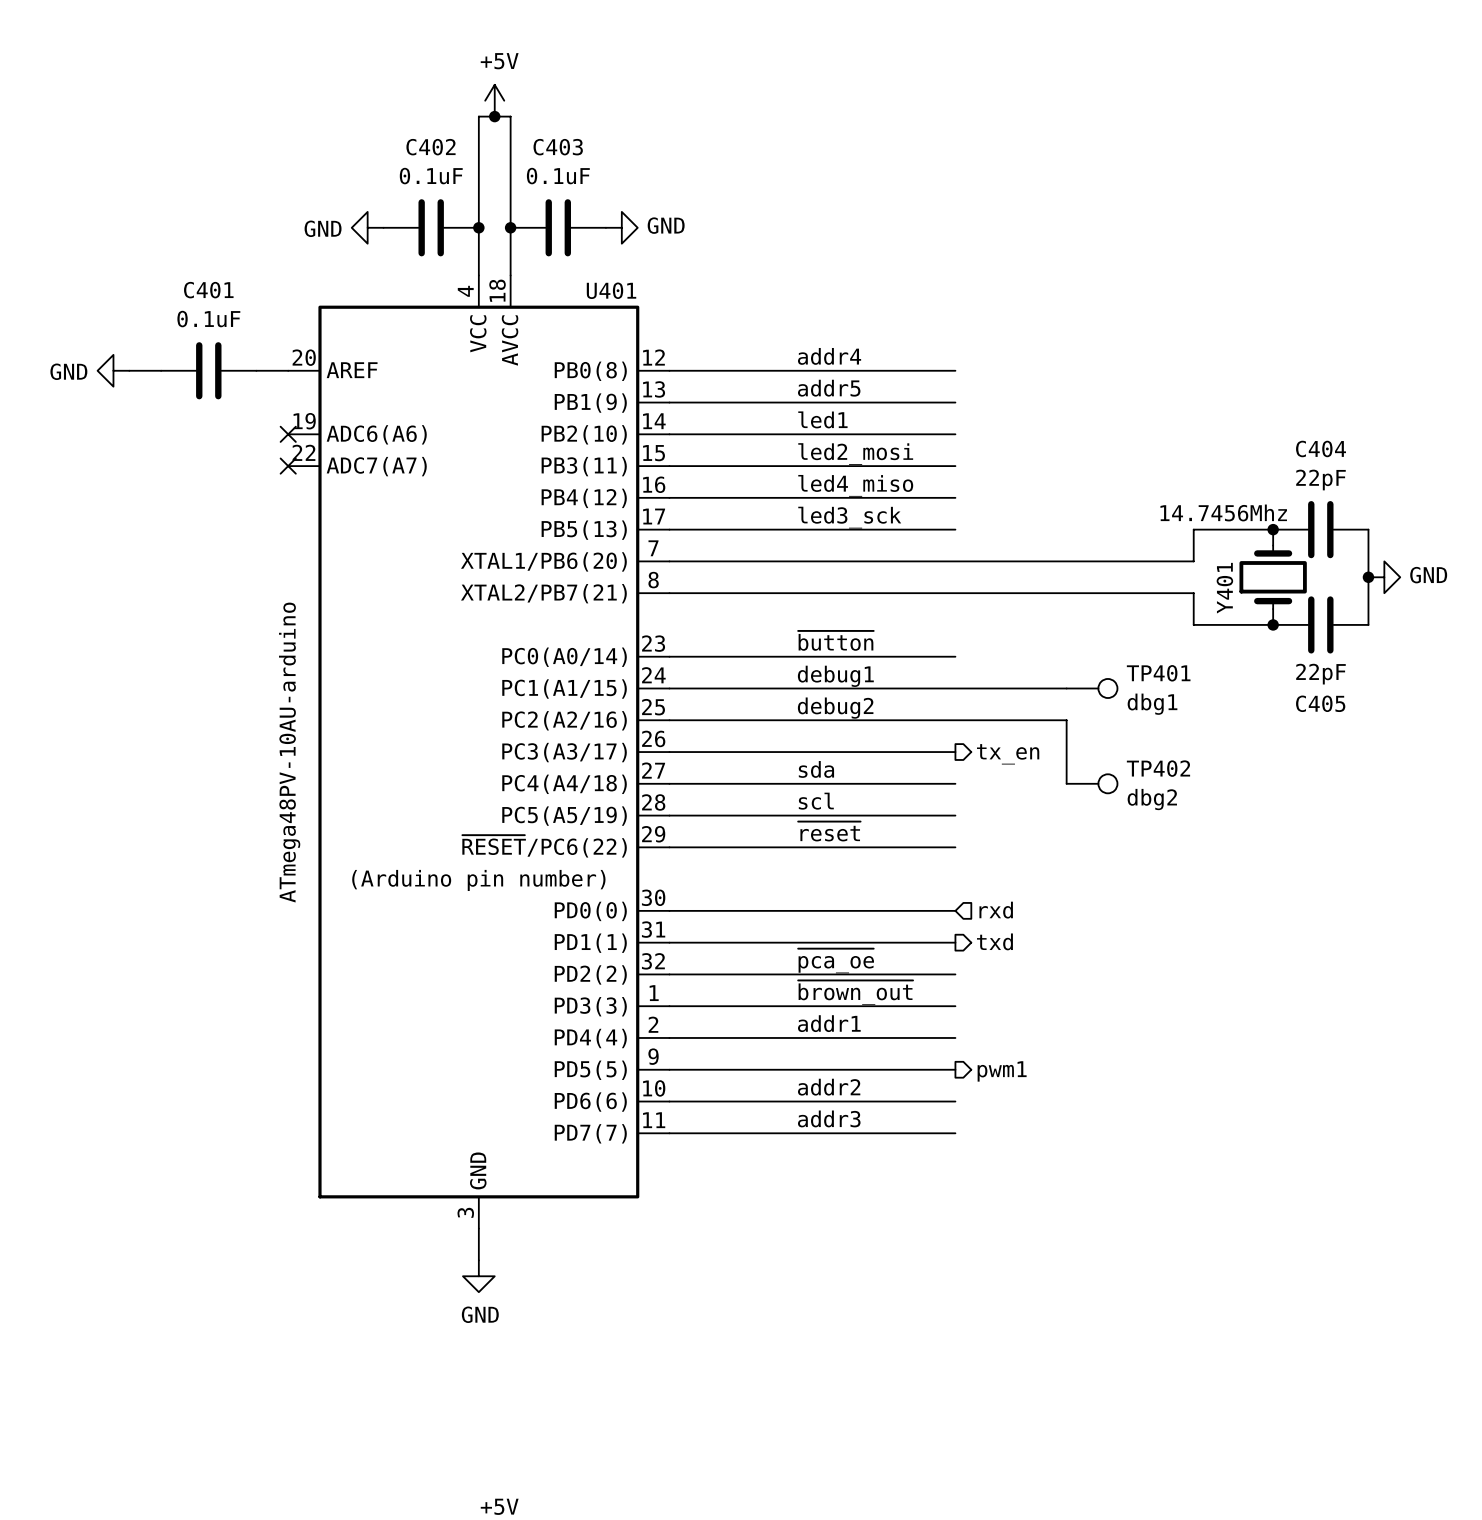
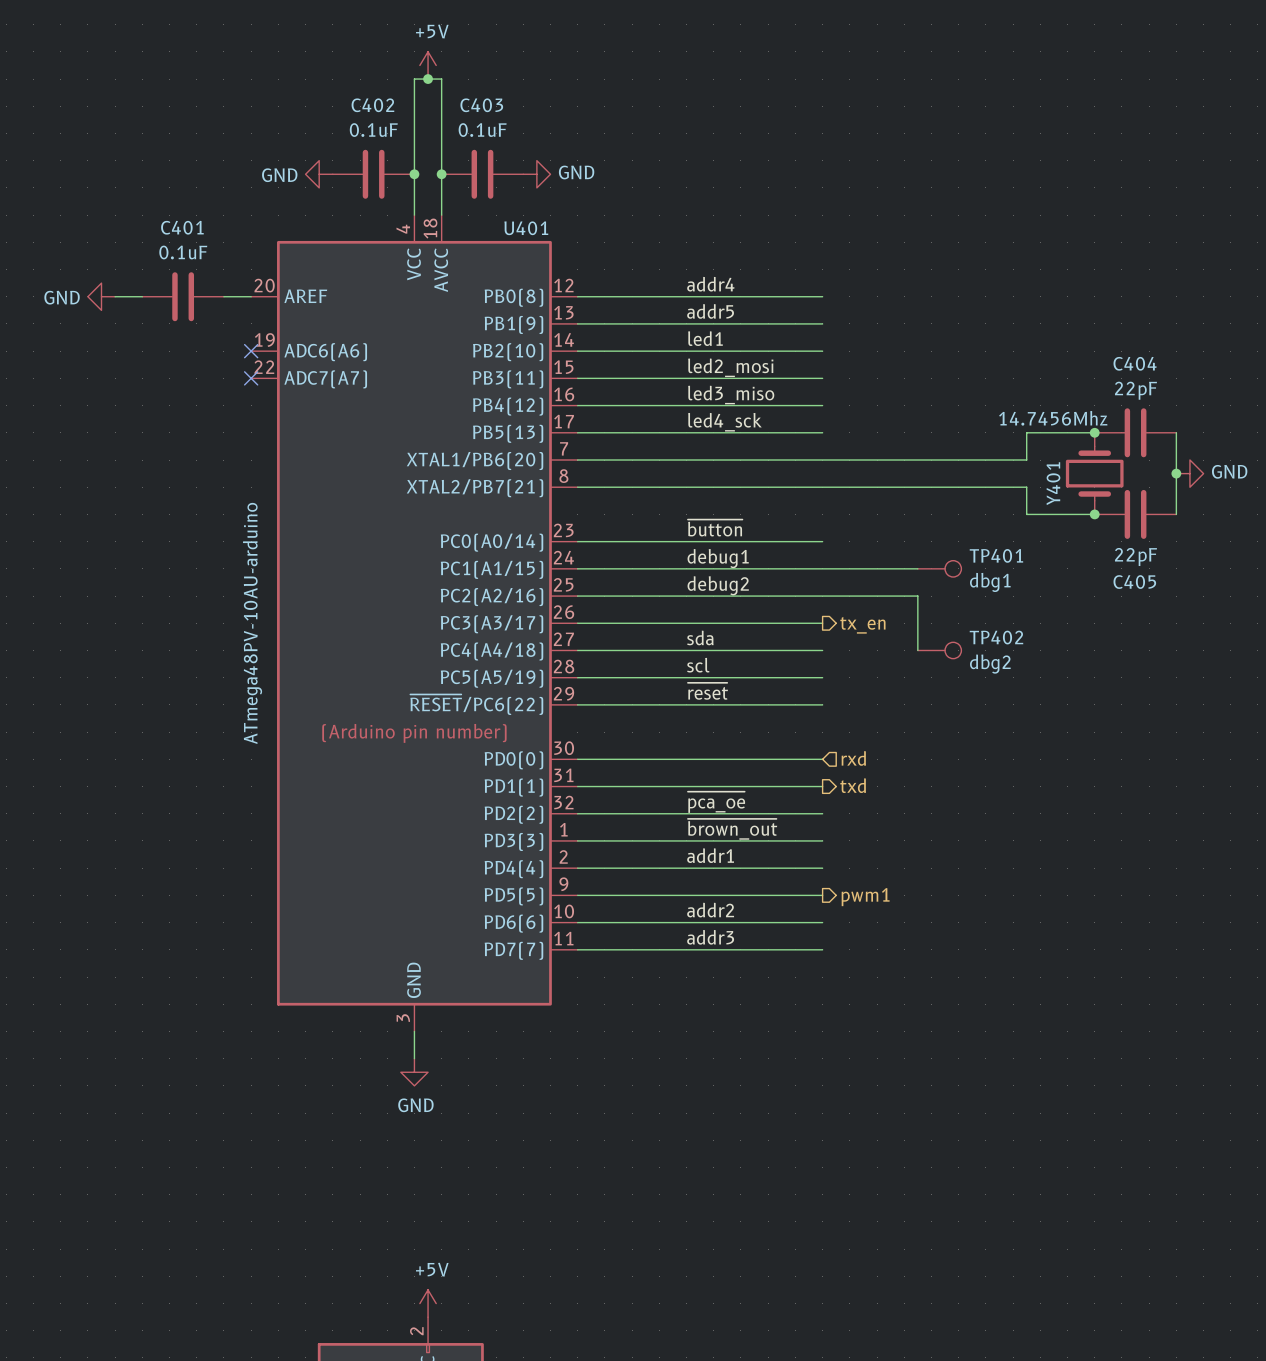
label: led4_miso (855, 485) -> led3_miso (731, 395)
label: led3_sck (849, 517) -> led4_sck (724, 422)

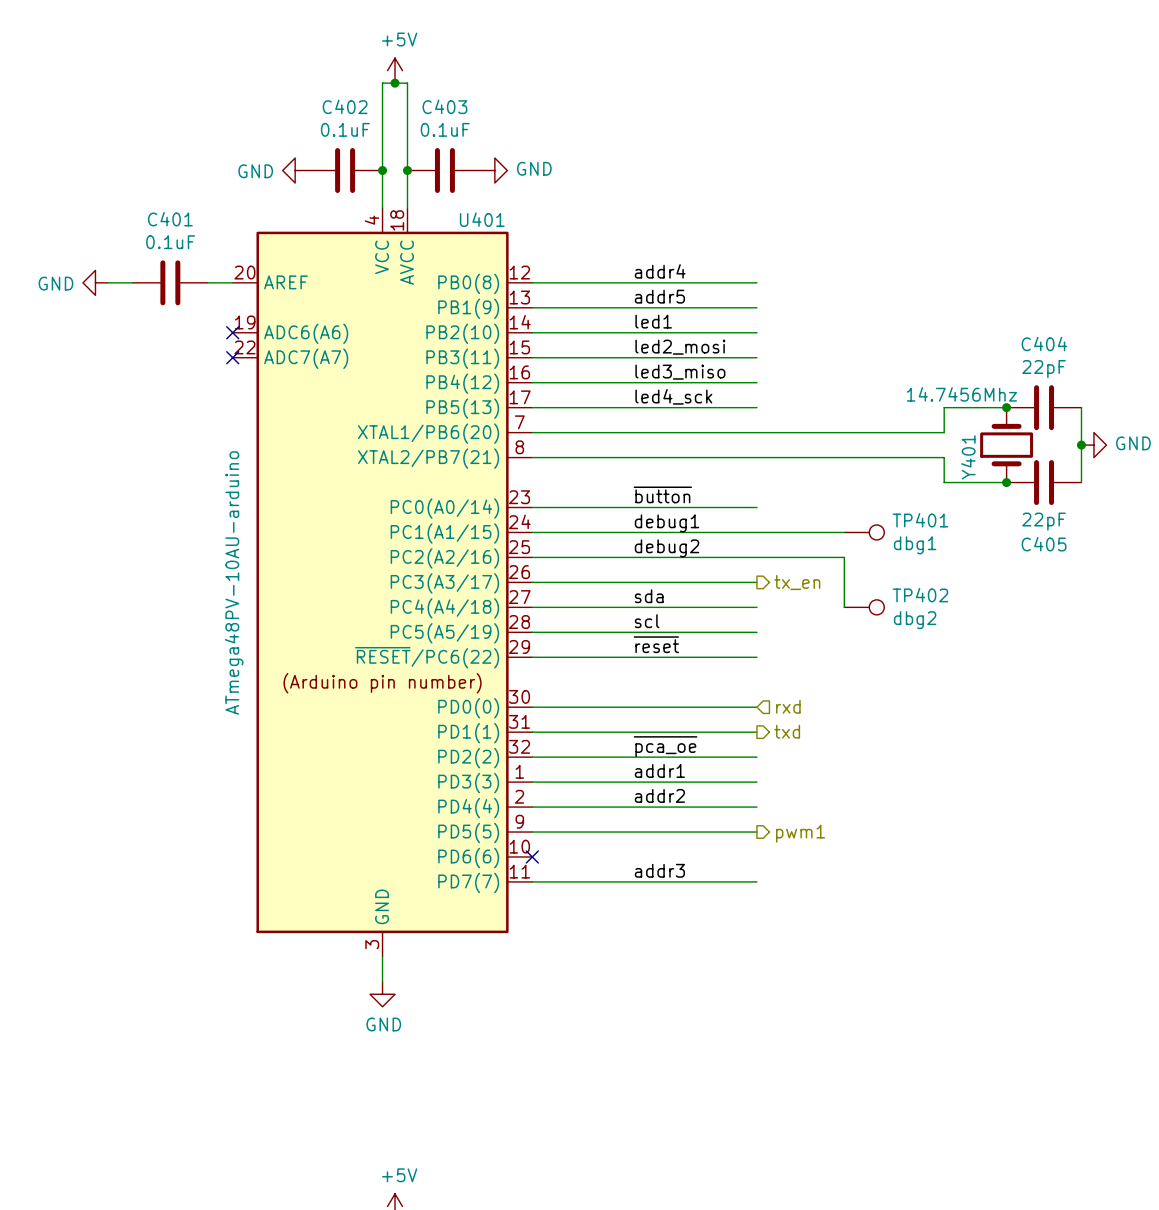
label: ~{brown_out} (732, 829) -> addr1 (659, 770)
label: addr1 (710, 855) -> addr2 (659, 795)
label: addr2 (710, 910) -> none
wire: (577, 922) (822, 922) -> none
no-connect mark: none -> (532, 856)

